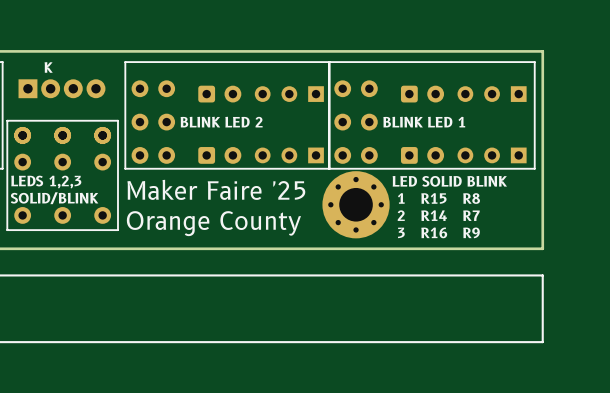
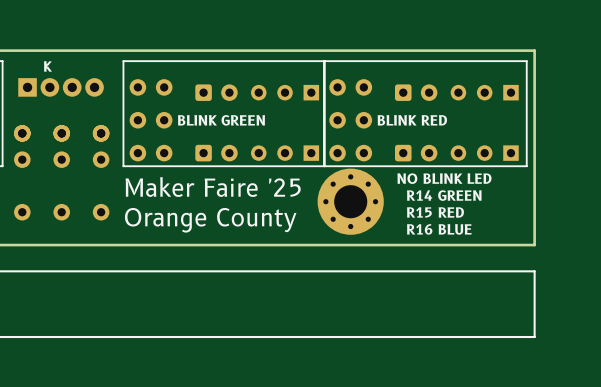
line: (117, 120) (7, 120) (7, 230) (117, 230) (117, 120) -> none
text: BLINK LED 2 (221, 122) -> BLINK GREEN (221, 120)
text: BLINK LED 1 (424, 122) -> BLINK RED (412, 120)
text: LED SOLID BLINK (449, 181) -> none
text: none -> NO BLINK LED (444, 178)
text: LEDS 1,2,3 (46, 182) -> none
text: SOLID/BLINK (54, 198) -> none
text: 1 R15 R8 (438, 198) -> R15 RED (435, 212)
text: none -> R14 GREEN (444, 195)
text: 2 R14 R7 (438, 215) -> none
text: 3 R16 R9 (438, 232) -> none
text: none -> R16 BLUE (439, 229)

